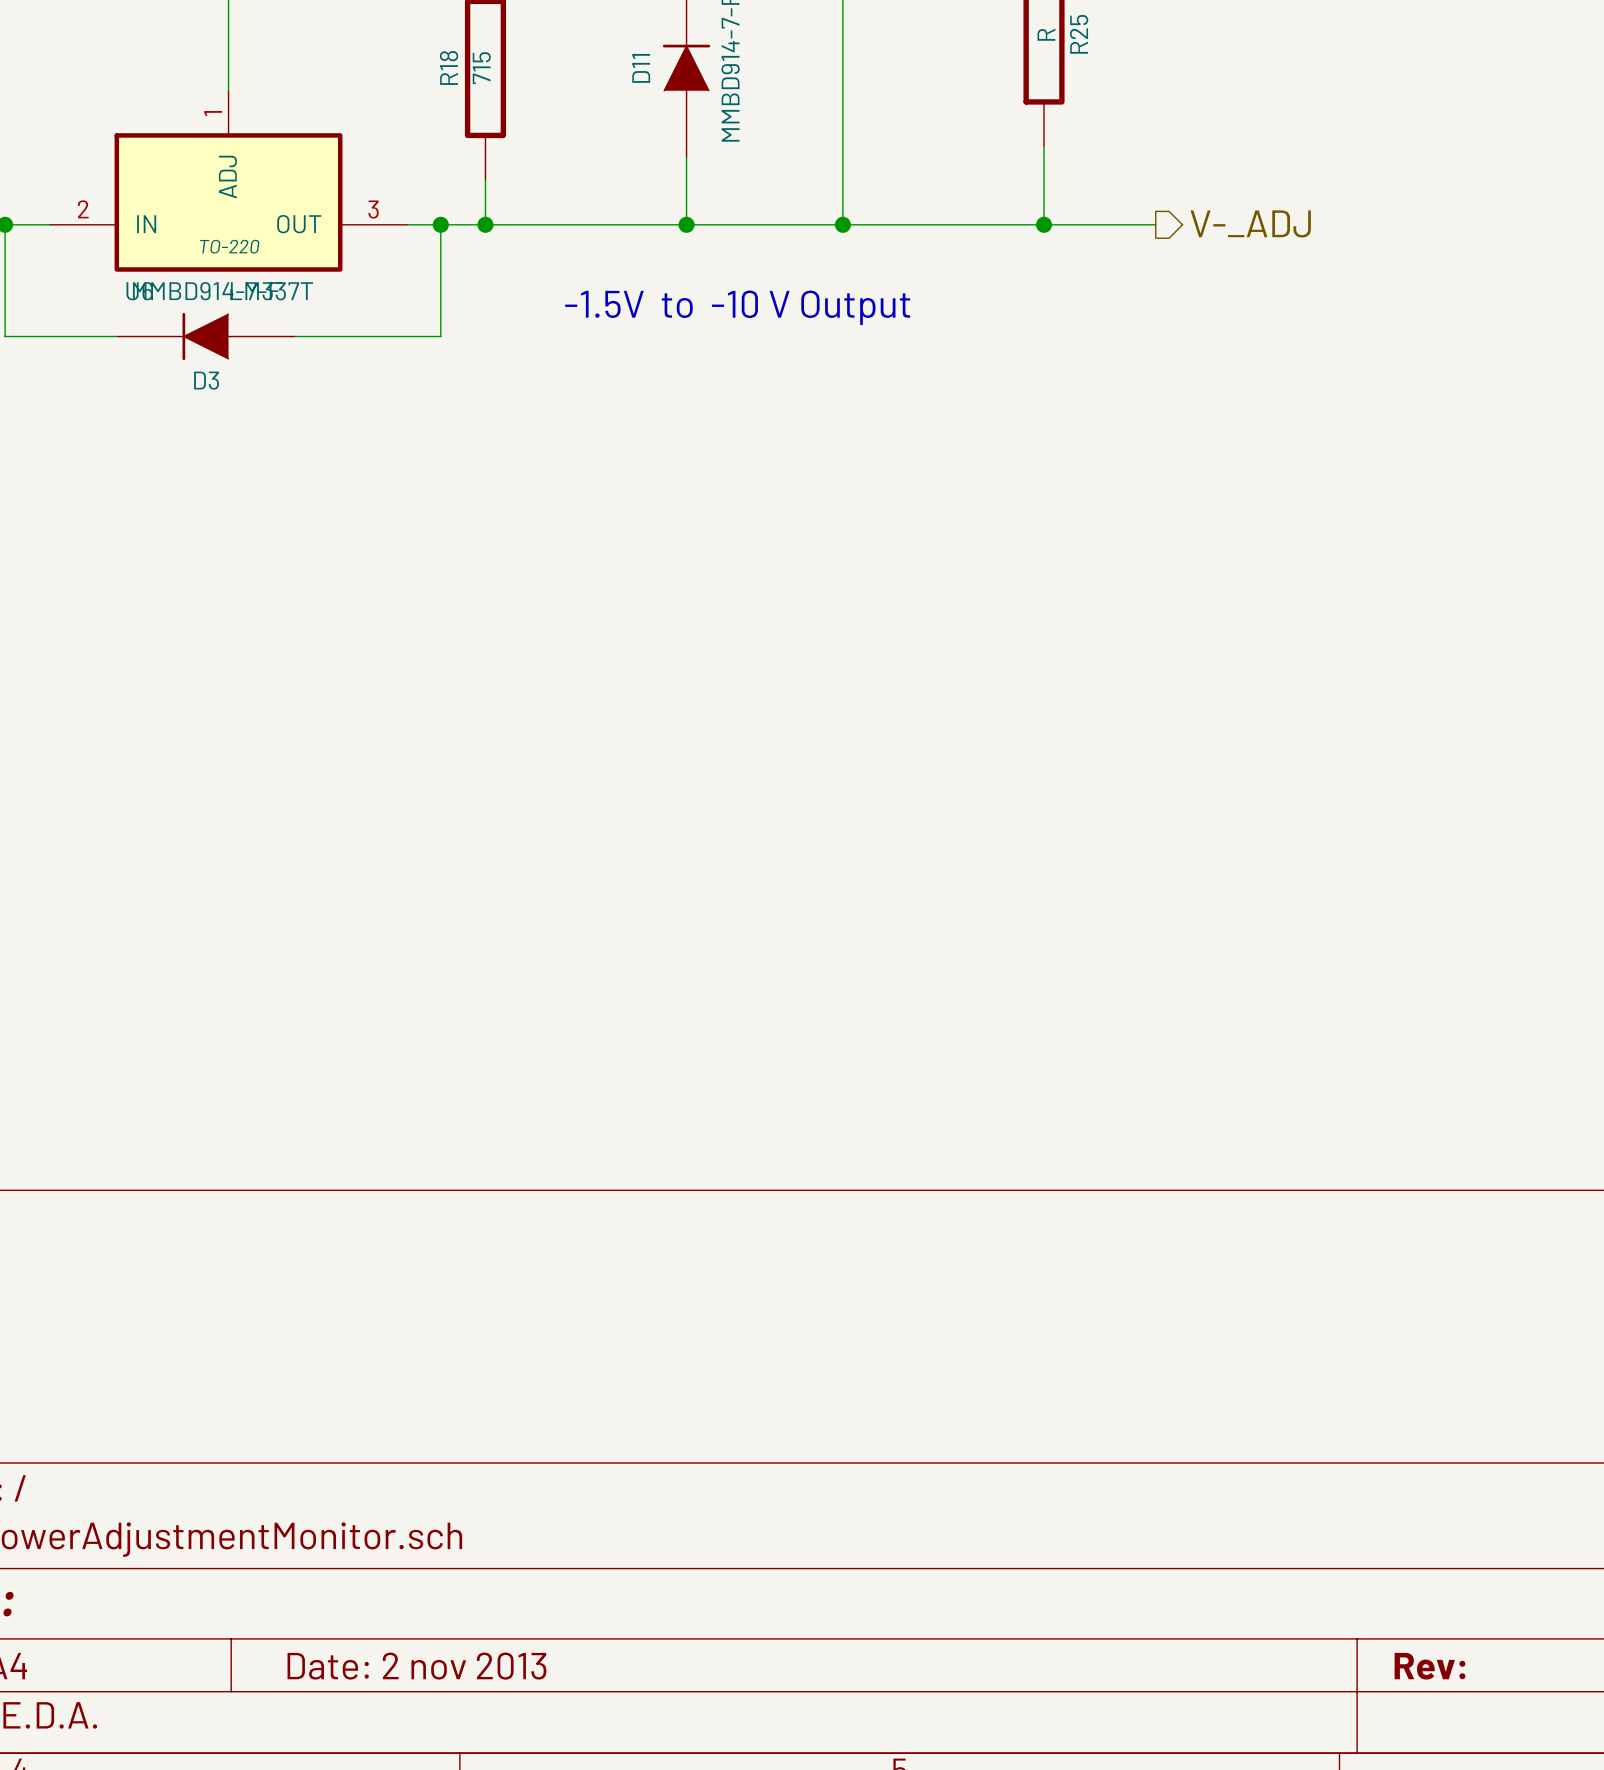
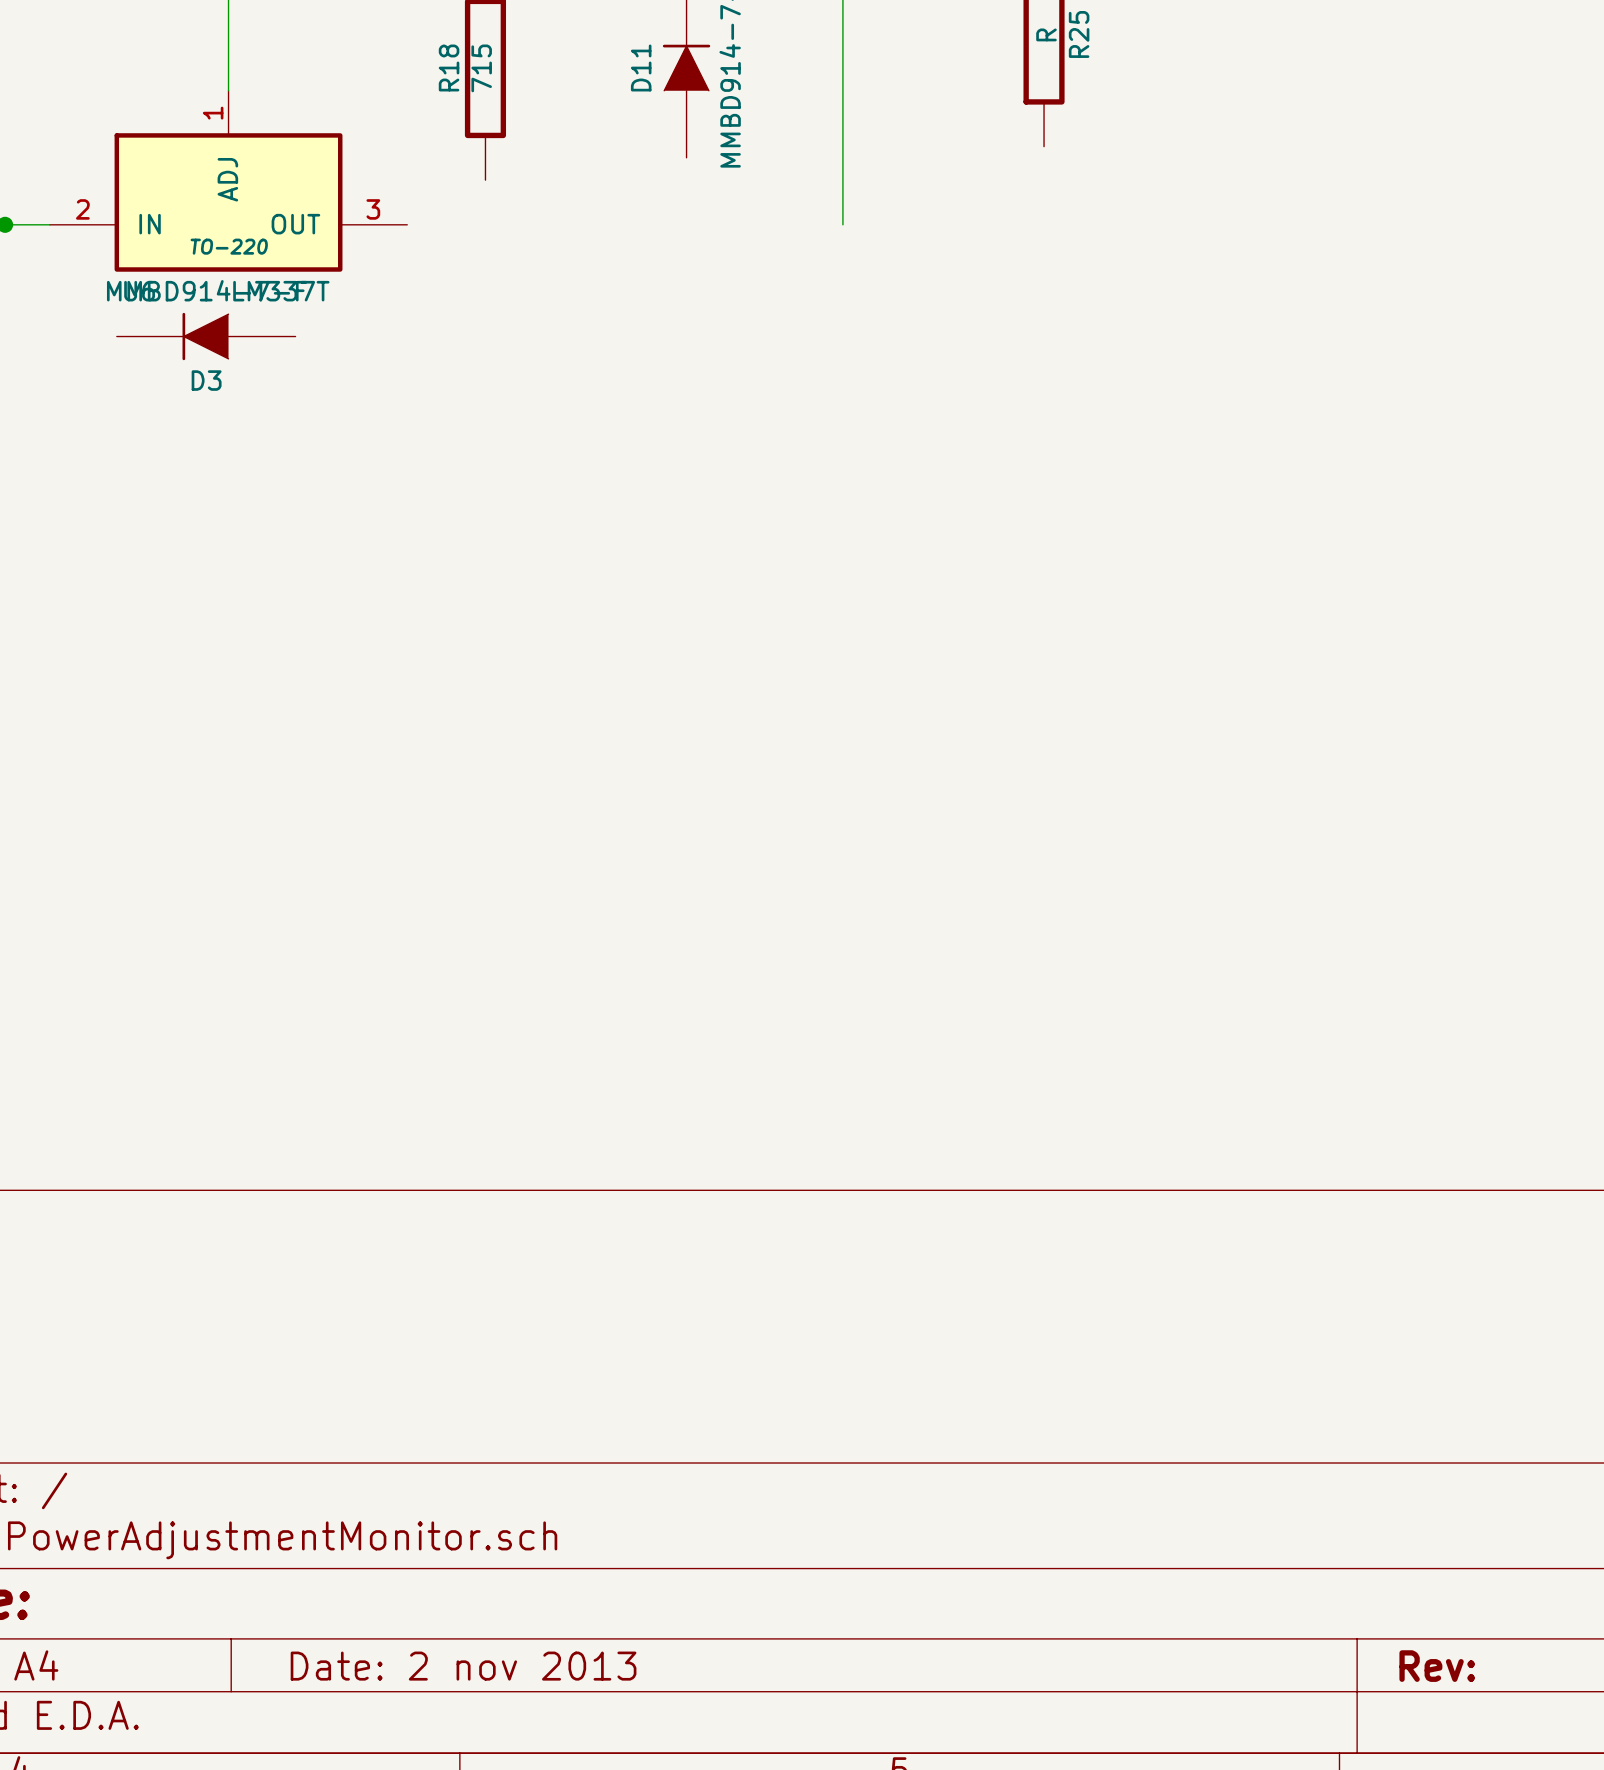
wire: (1044, 146) (1044, 224) -> none
wire: (686, 157) (686, 224) -> none
wire: (485, 180) (485, 224) -> none
hierarchical label: V-_ADJ (1250, 223) -> none
wire: (5, 224) (5, 336) (116, 336) -> none
wire: (407, 224) (1155, 224) -> none
wire: (440, 224) (440, 336) (295, 336) -> none
junction: (440, 224) -> none
junction: (485, 224) -> none
junction: (686, 224) -> none
junction: (842, 224) -> none
junction: (1044, 224) -> none
text: -1.5V to -10 V Output (737, 307) -> none

